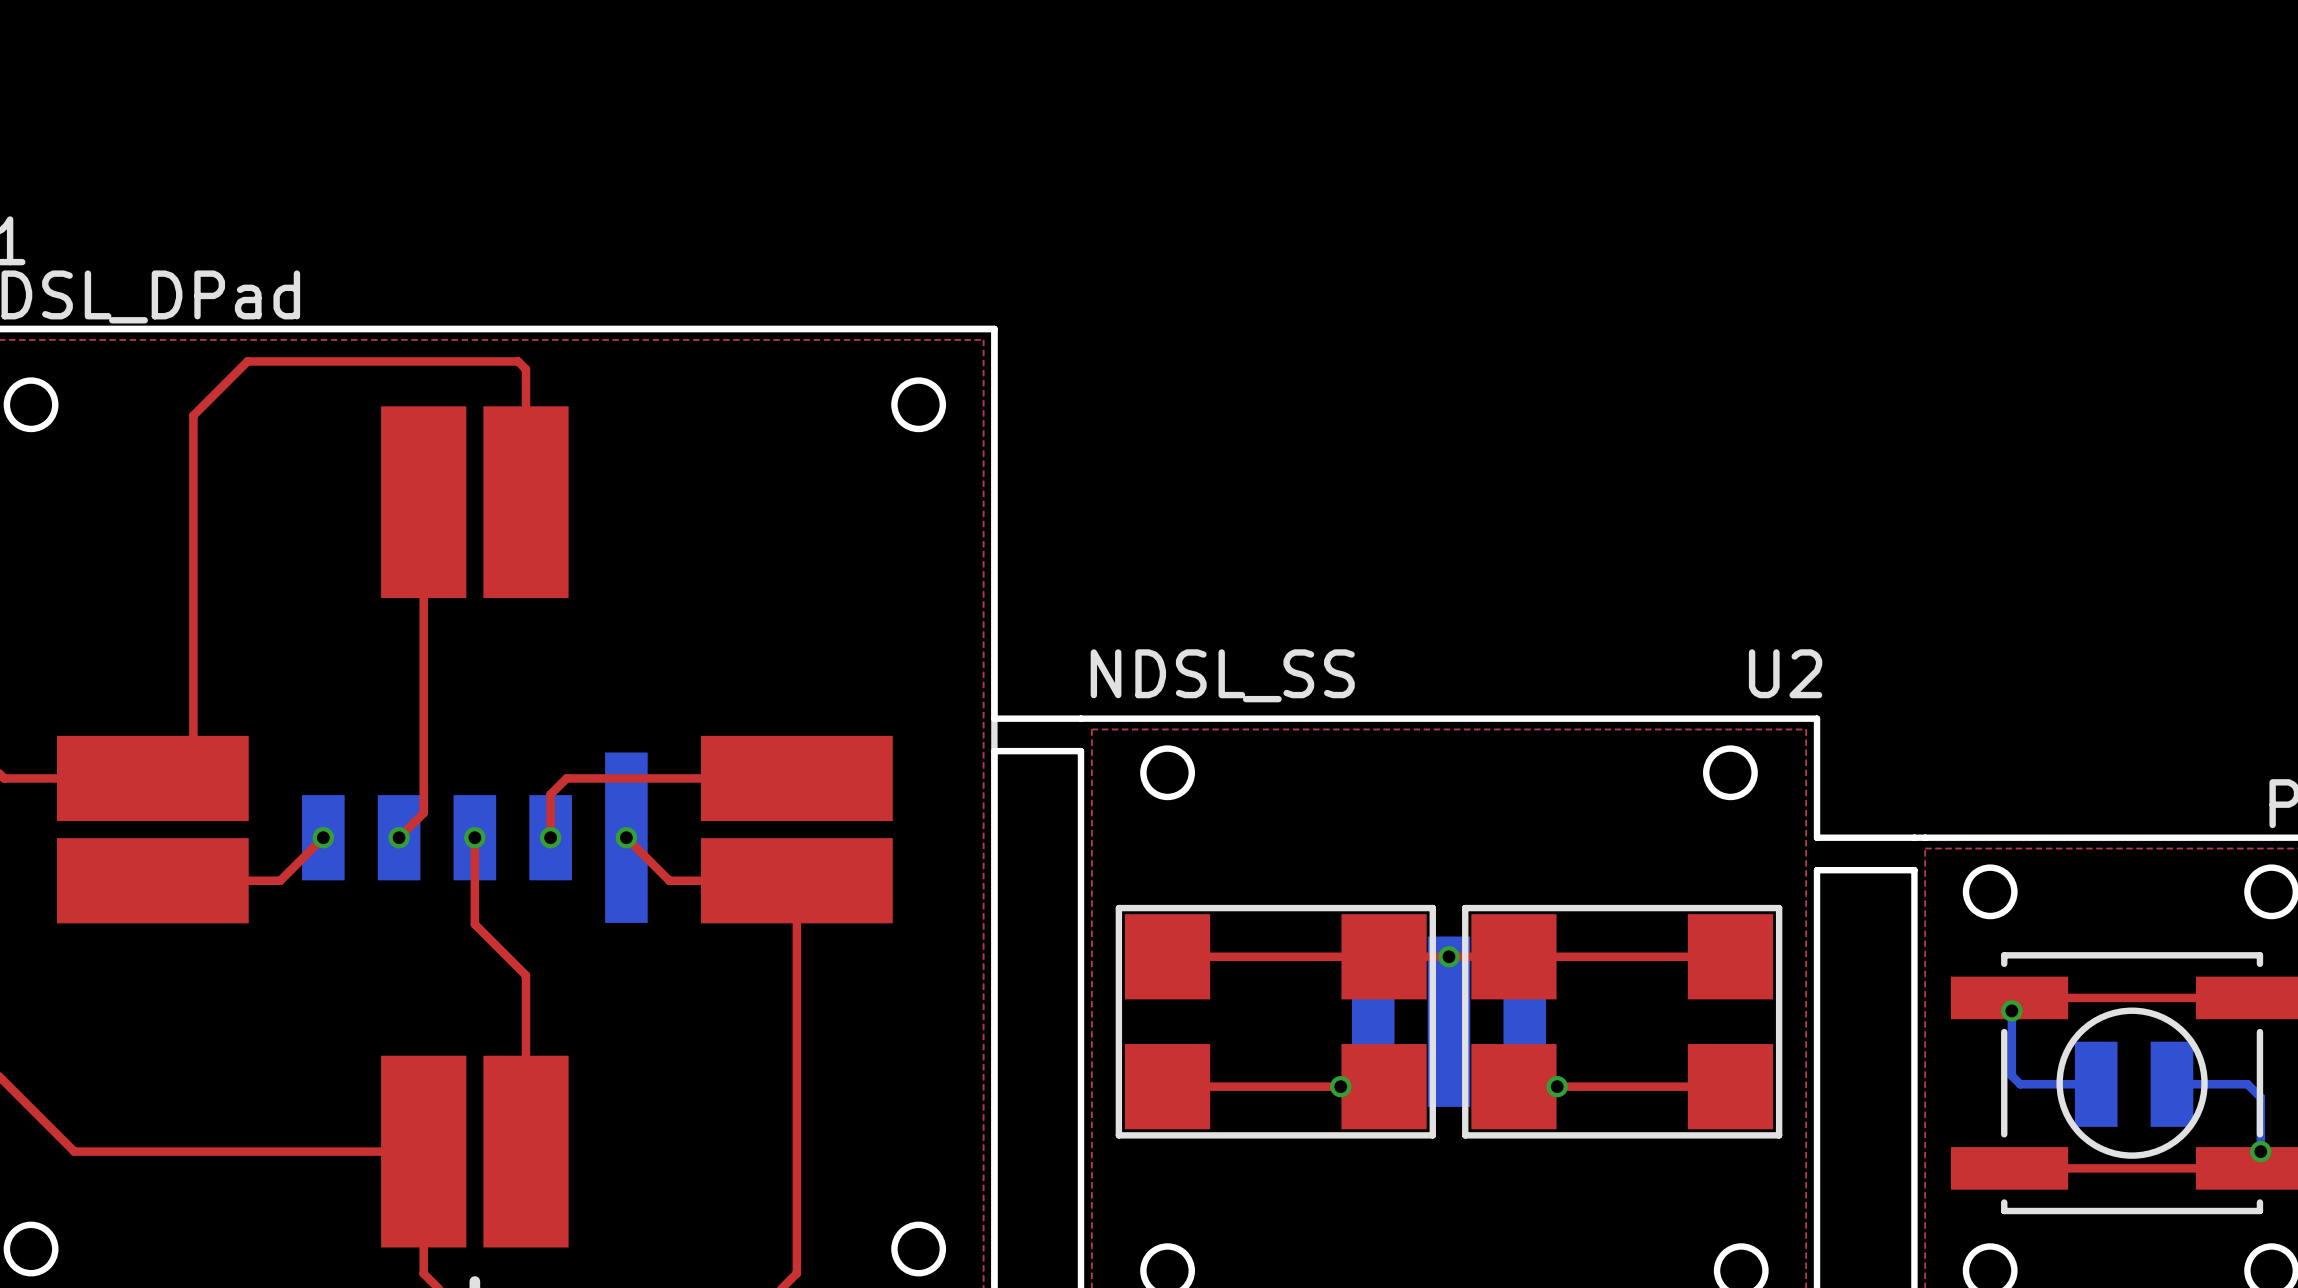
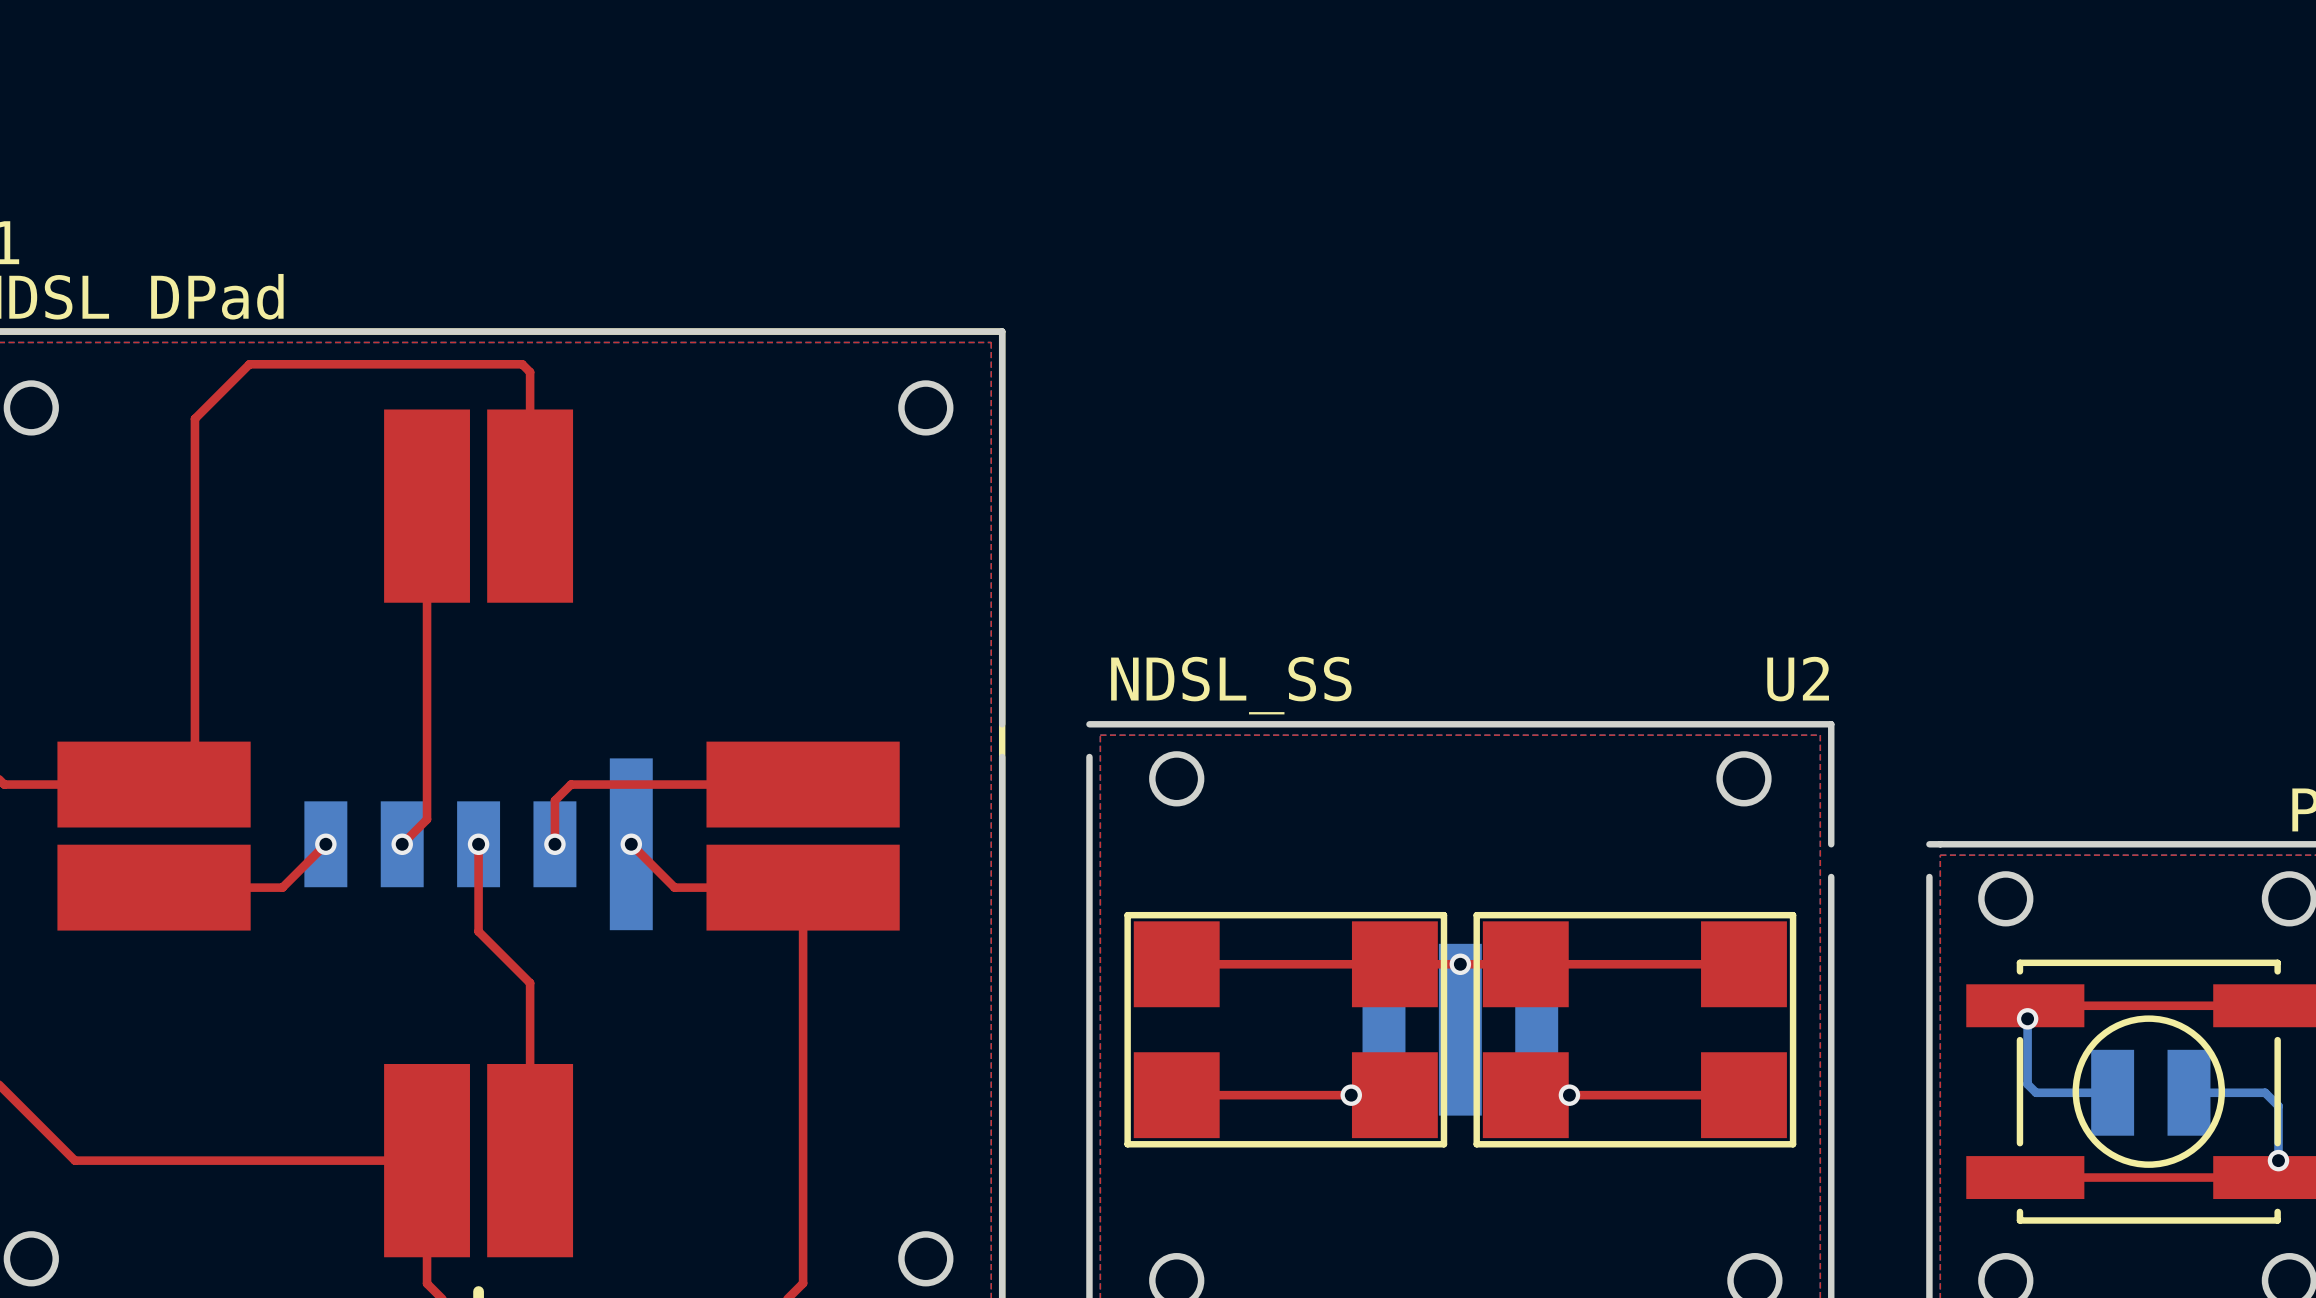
board edge: (994, 718) (1080, 718) -> none
board edge: (994, 751) (1080, 751) -> none
board edge: (1817, 837) (1914, 837) -> none
board edge: (1817, 870) (1914, 870) -> none

